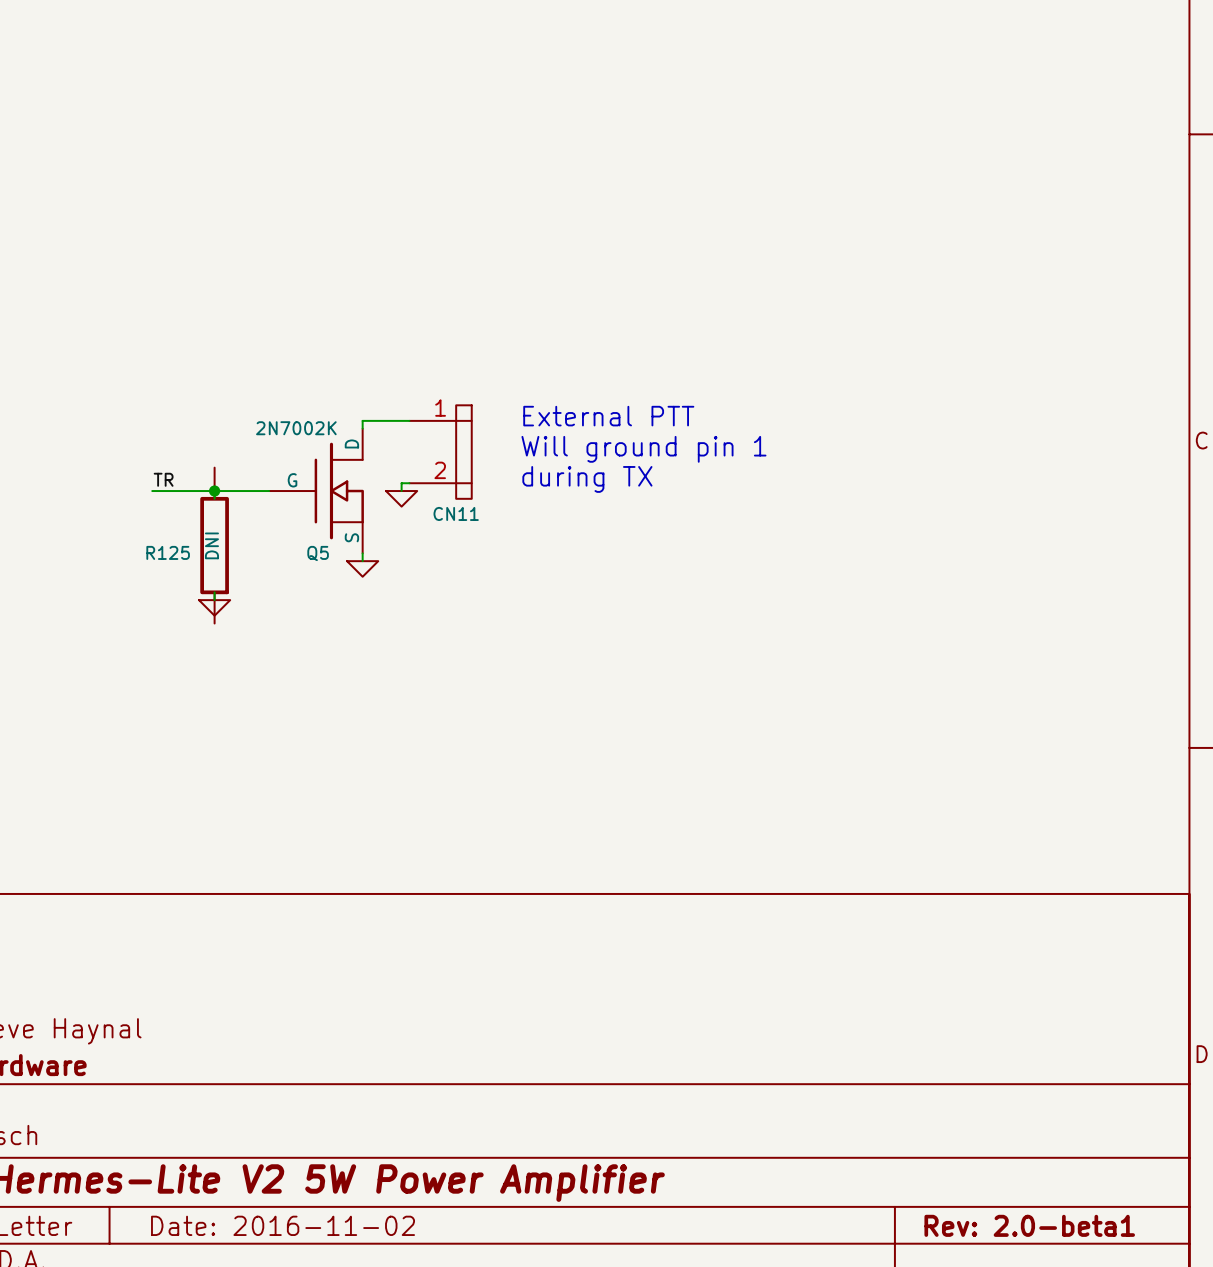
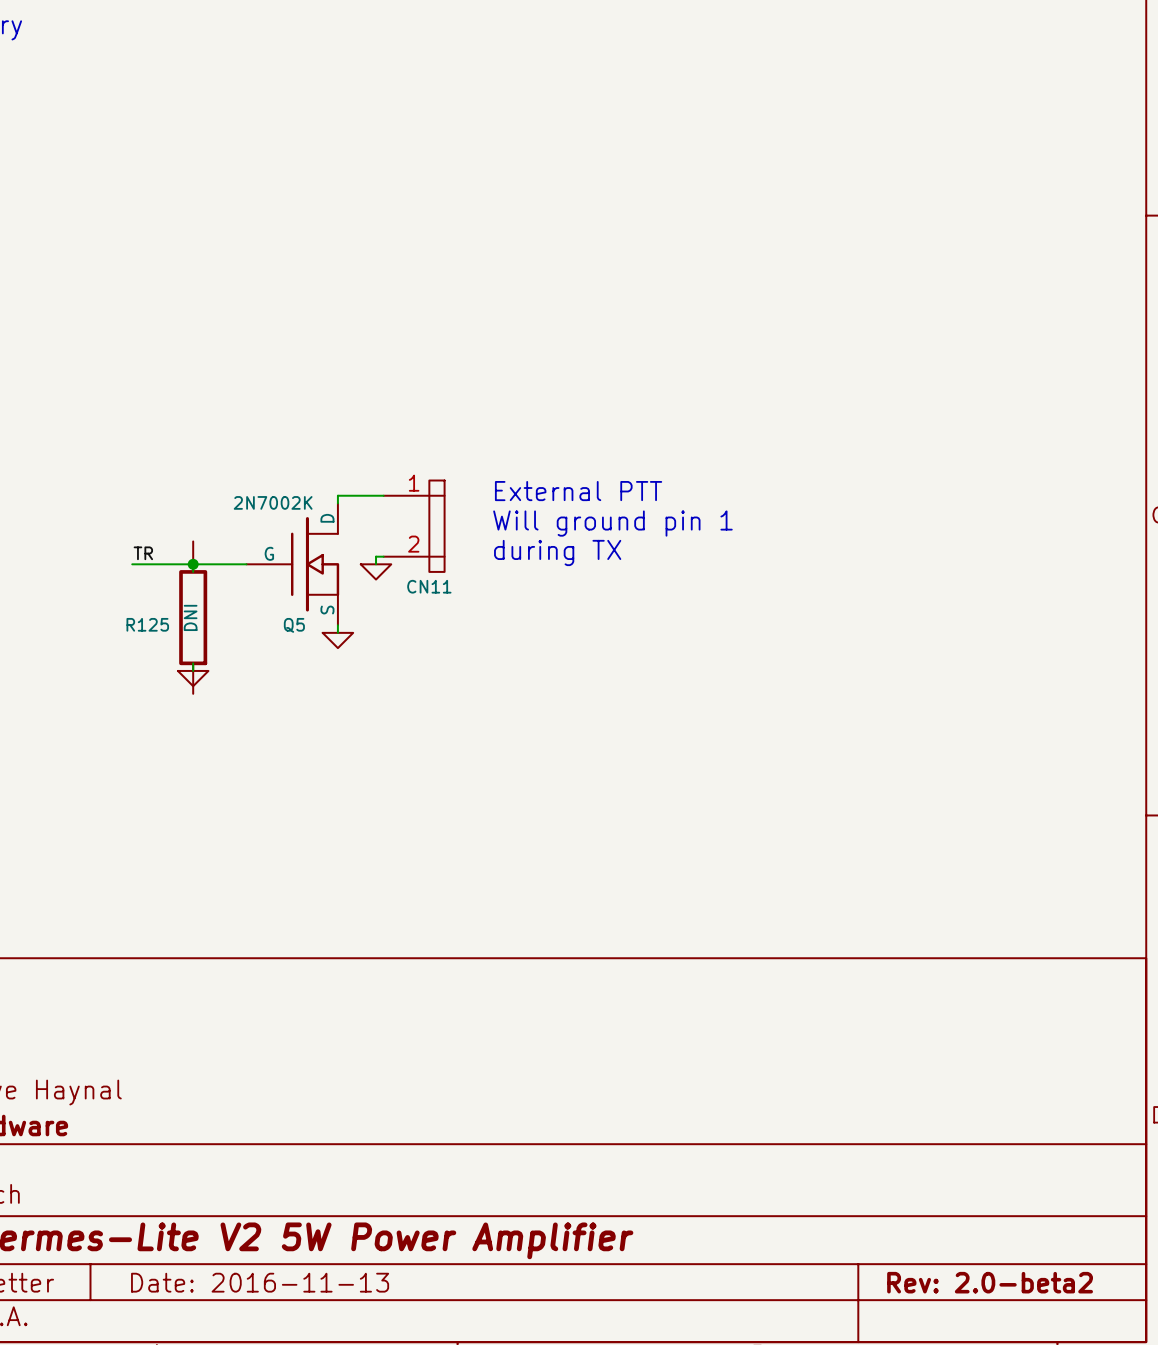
title block: Date: 2016-11-02 (283, 1225) -> Date: 2016-11-13 (260, 1282)
title block: Rev: 2.0-beta1 (1029, 1225) -> Rev: 2.0-beta2 (990, 1282)

